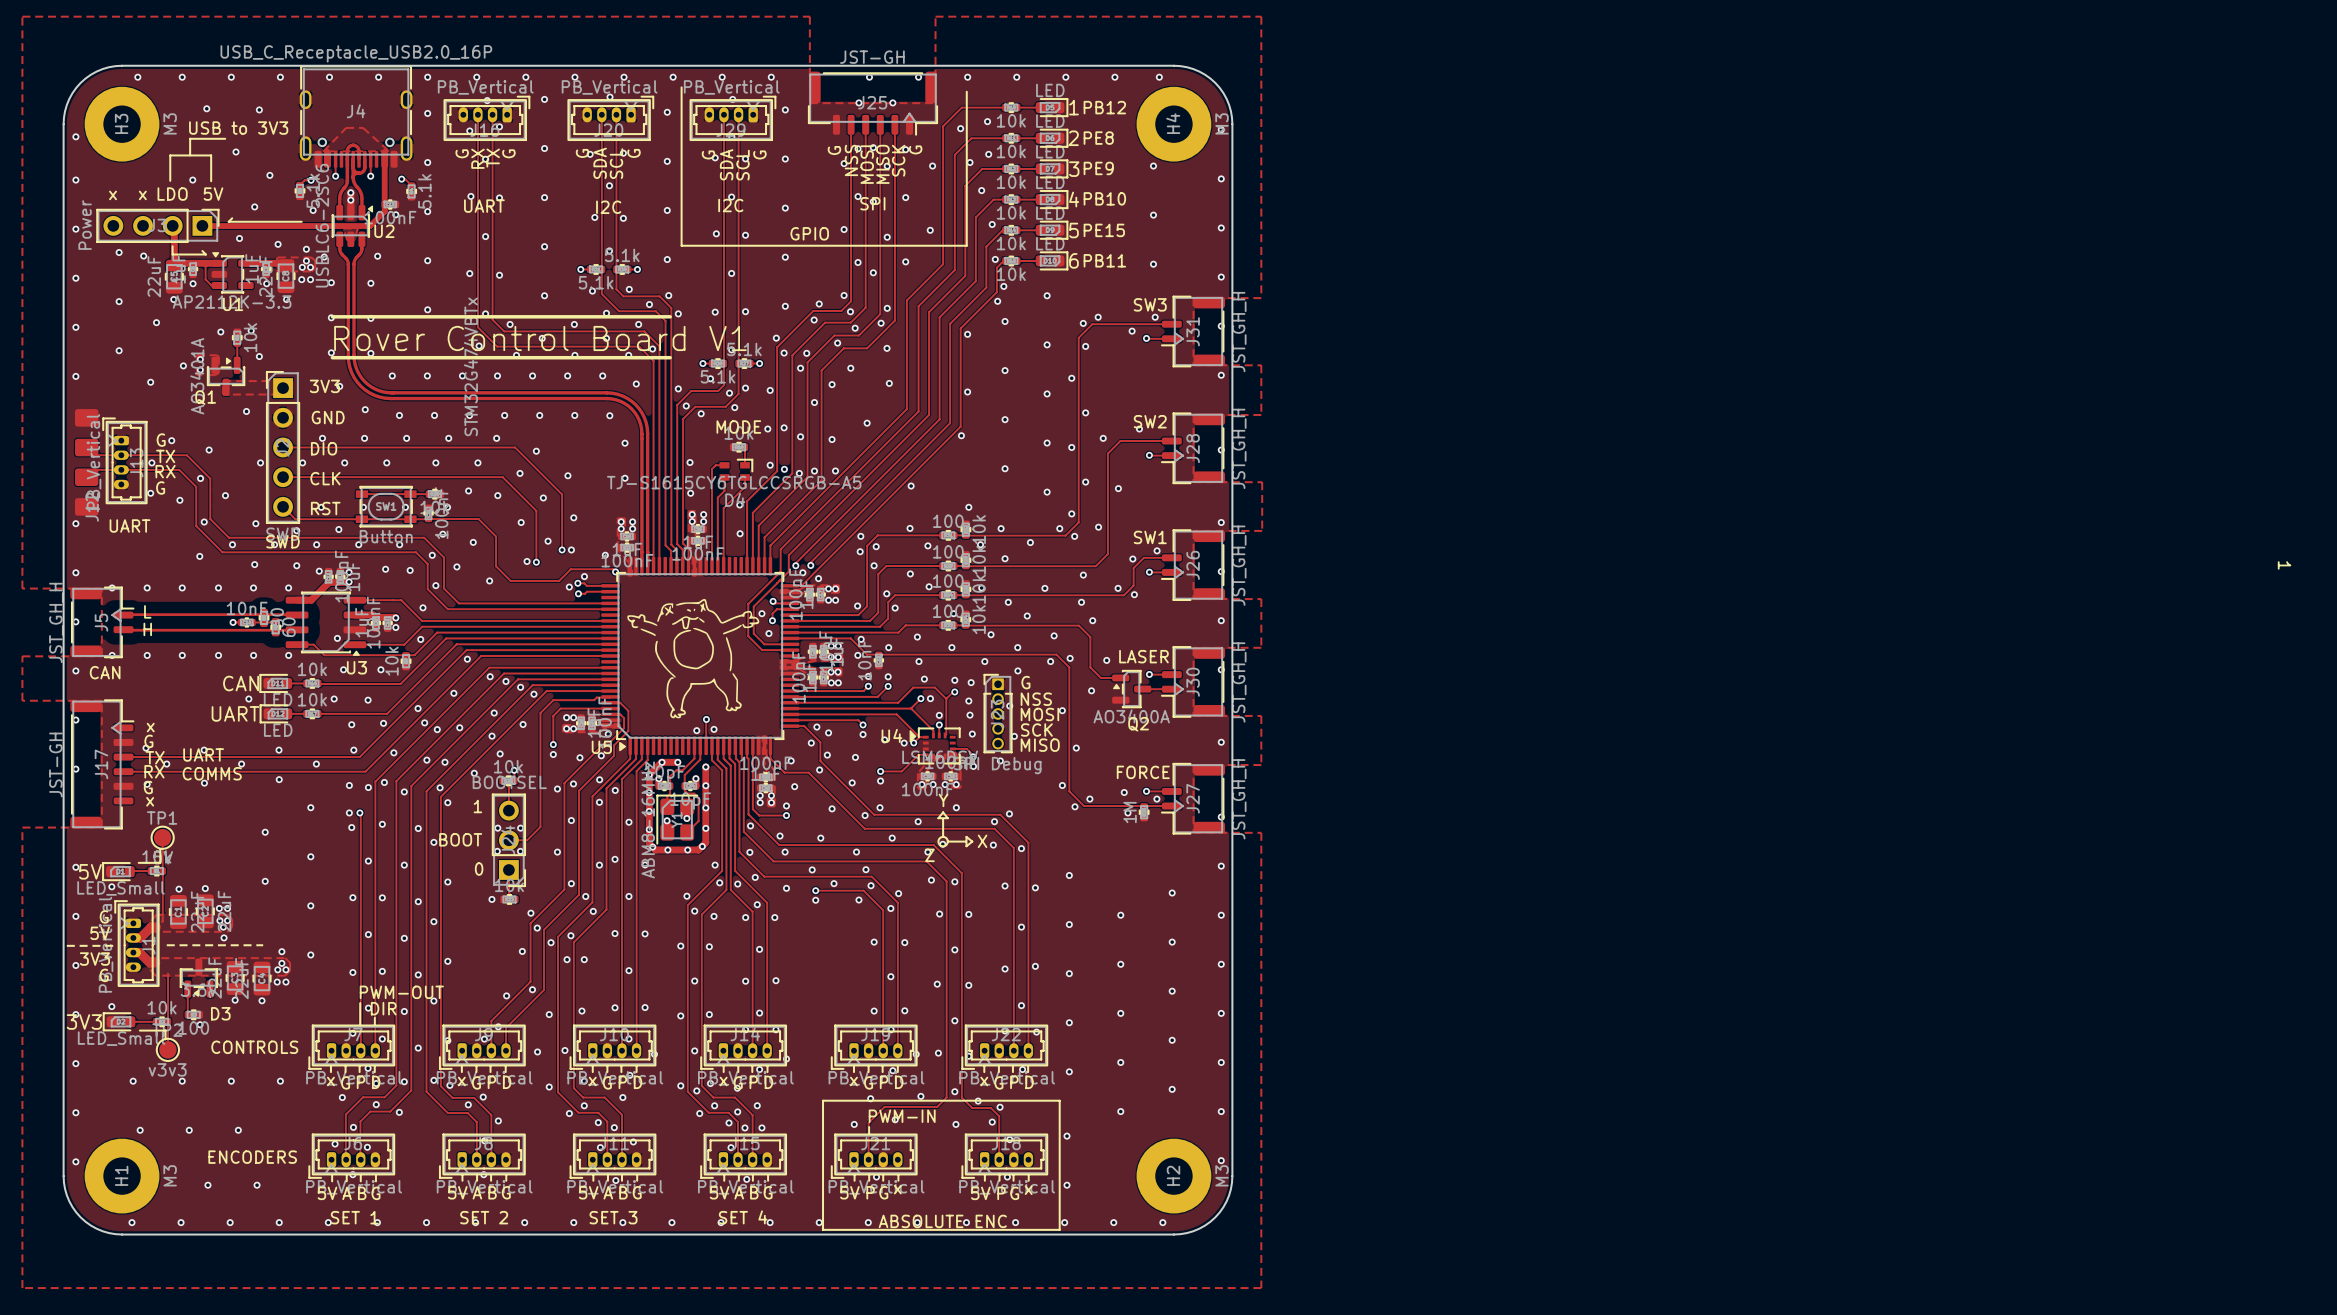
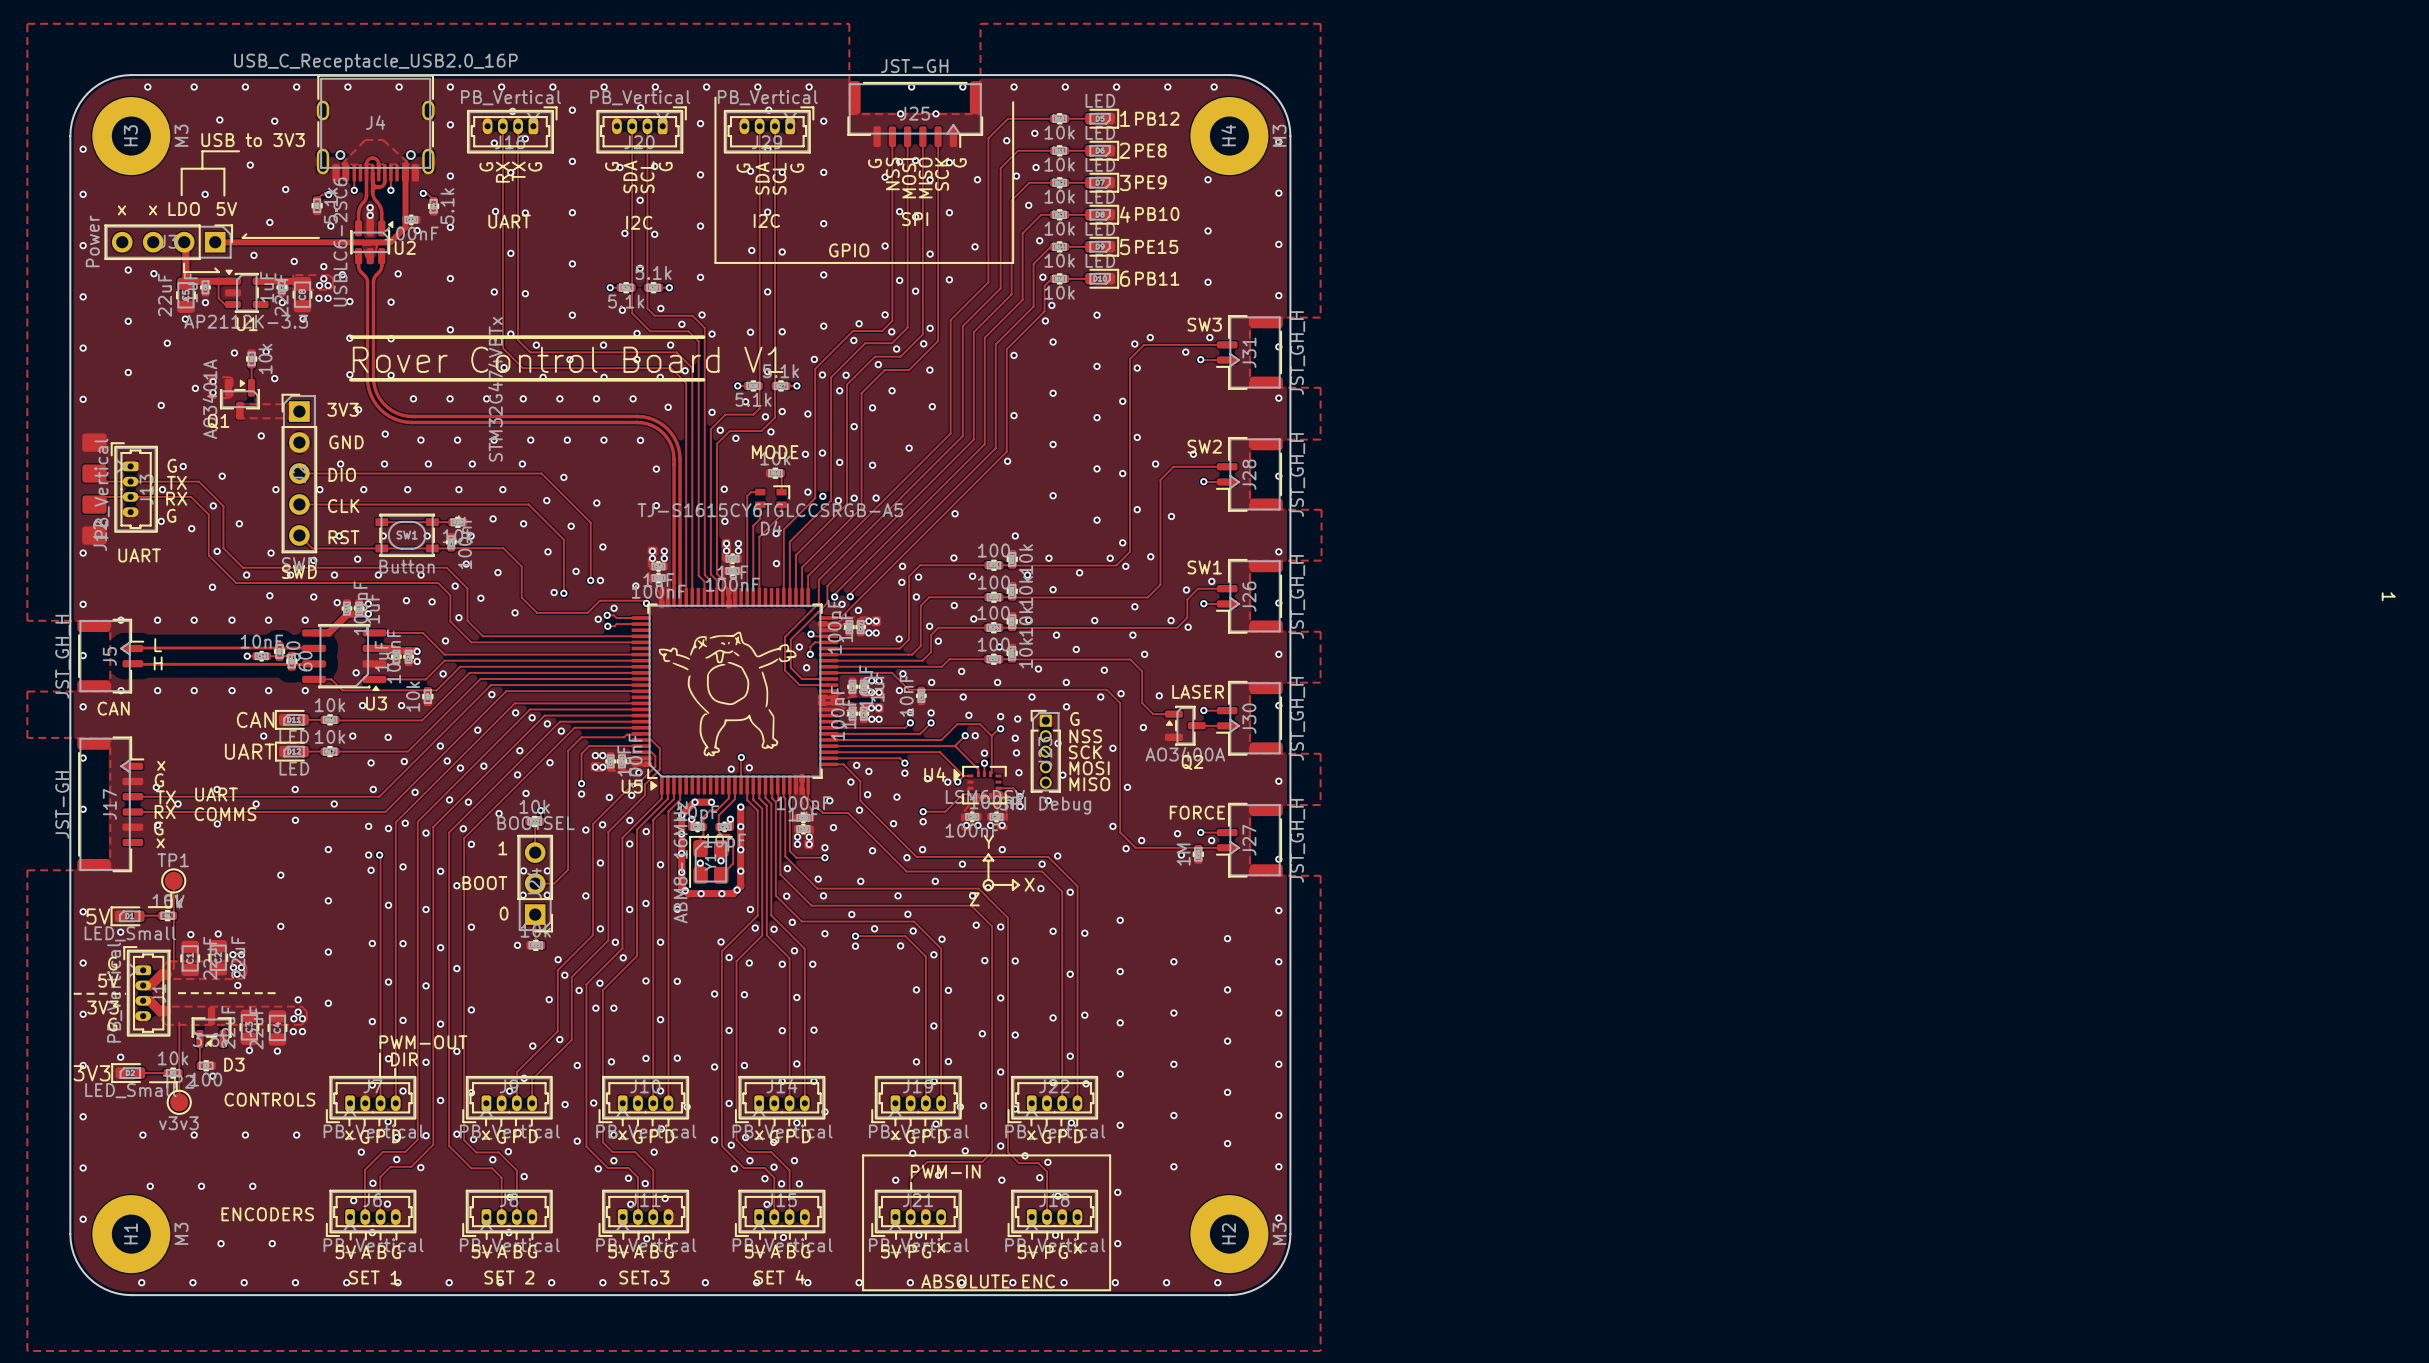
text: MOSI (1039, 714) -> SCK (1085, 752)
text: SCK (1036, 730) -> MOSI (1089, 768)

